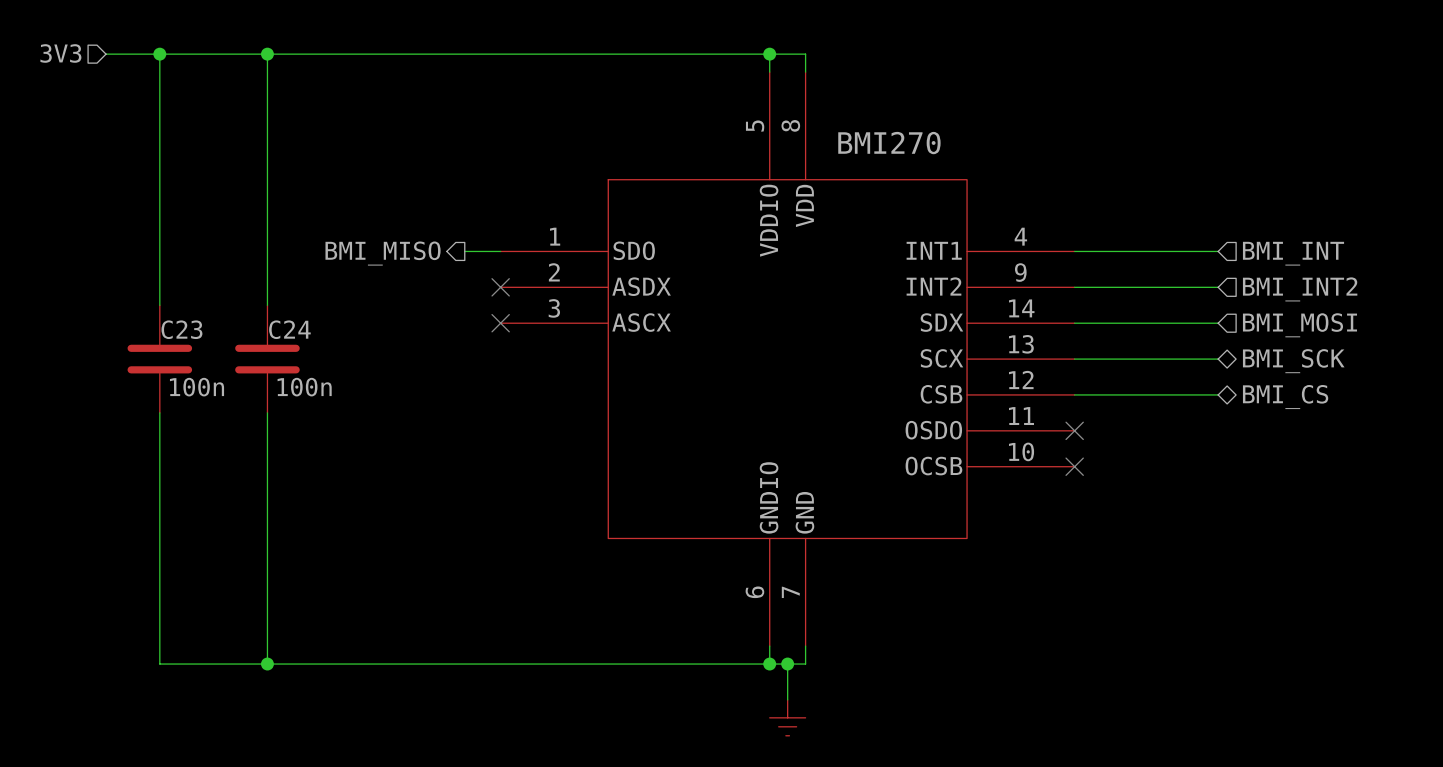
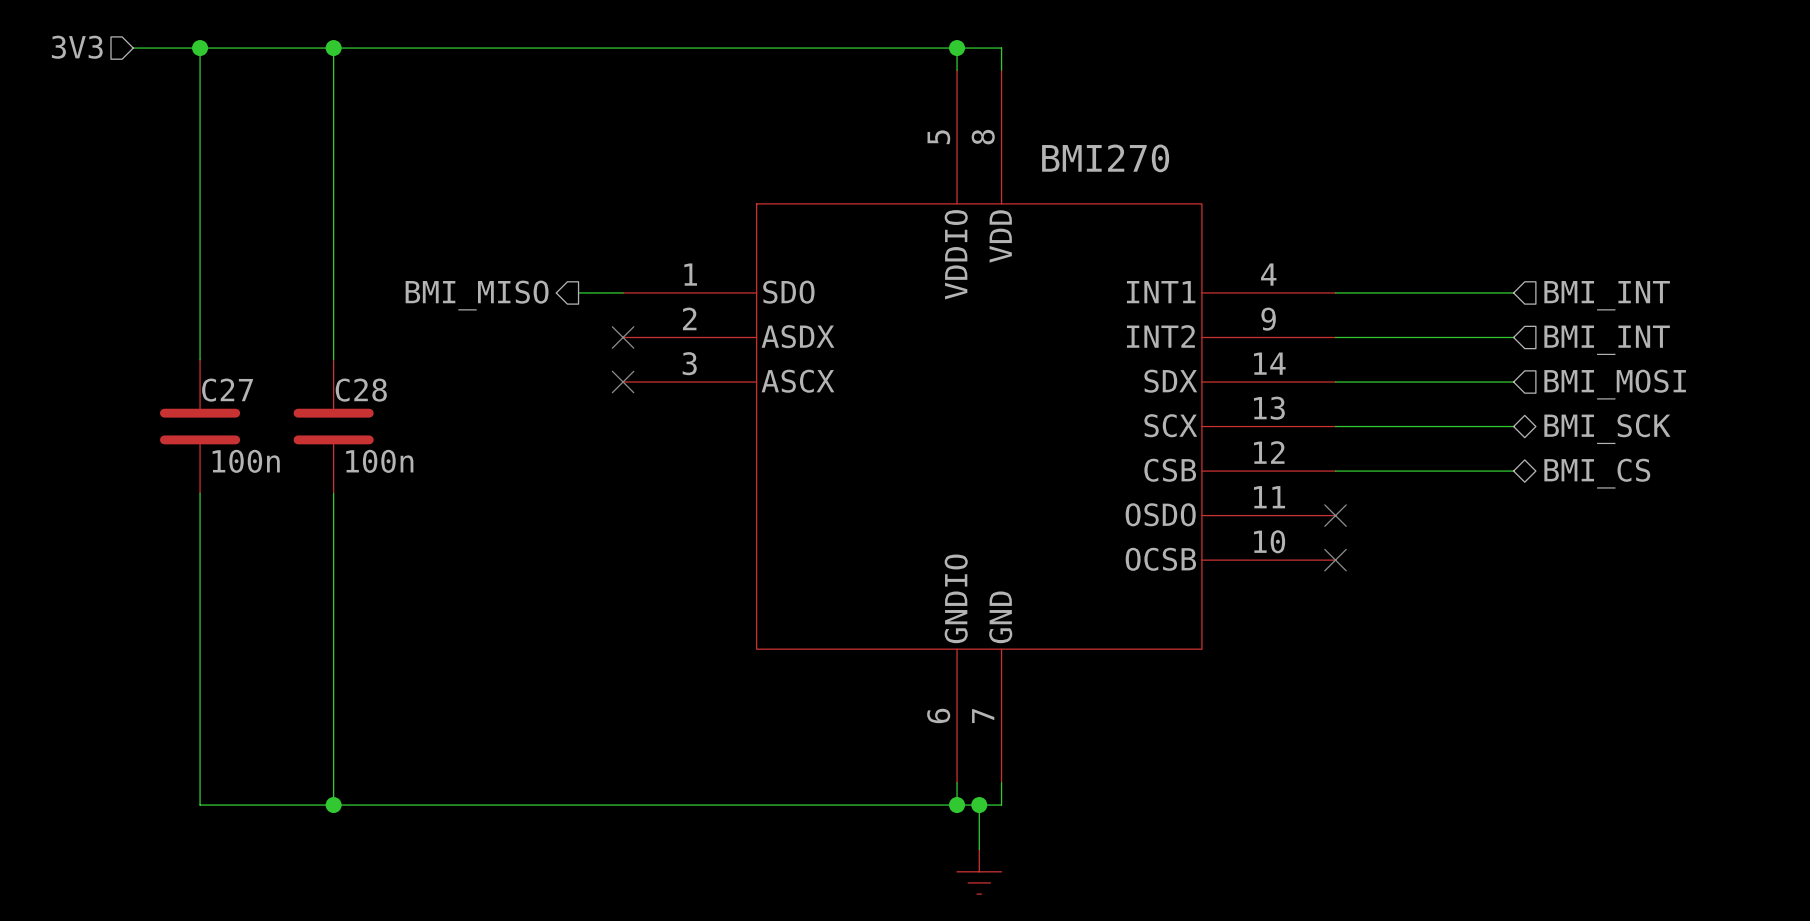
hierarchical label: BMI_INT2 (1300, 289) -> BMI_INT (1607, 340)
C23 name: C23 (181, 329) -> C27 (227, 390)
C24 name: C24 (289, 329) -> C28 (361, 390)

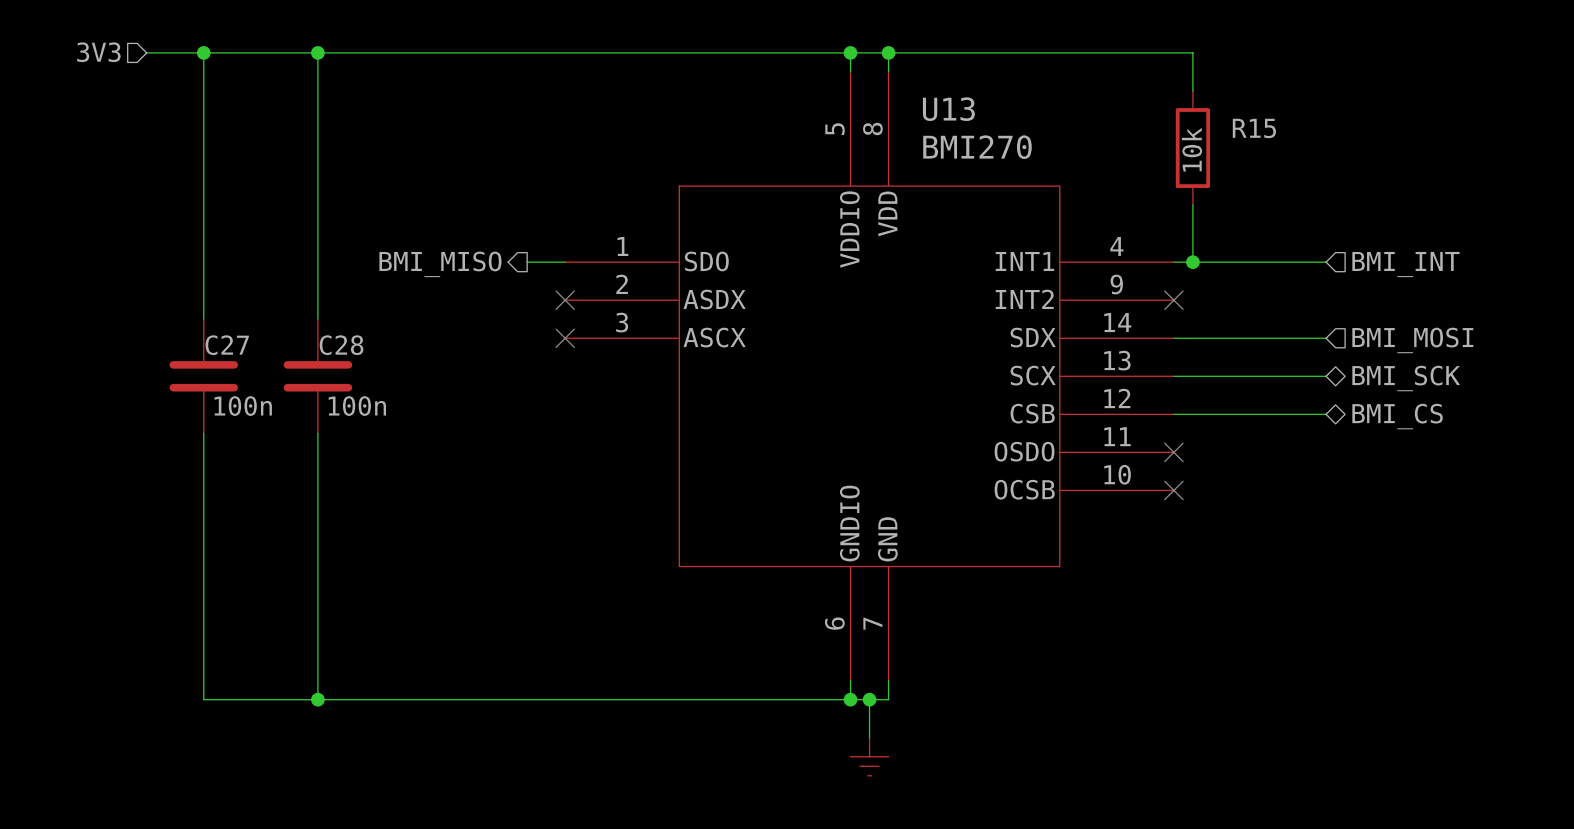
wire: none -> (888, 52) (1192, 52) (1192, 90)
junction: none -> (888, 52)
U13 name: none -> U13 (948, 109)
R15: none -> 10k (1192, 148)
wire: none -> (1192, 205) (1192, 262)
junction: none -> (1192, 262)
wire: (1335, 337) (1513, 337) -> none
no-connect mark: none -> (1173, 300)
hierarchical label: BMI_INT (1607, 340) -> none

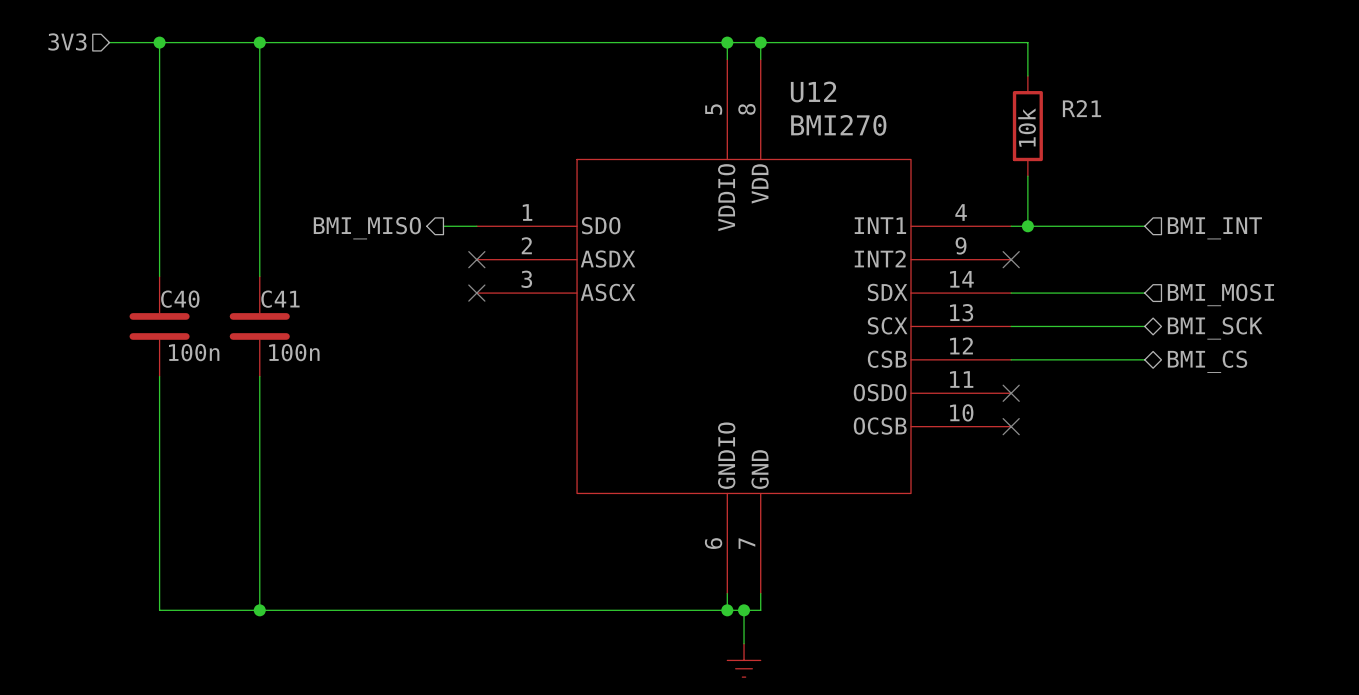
U13 name: U13 (948, 109) -> U12 (813, 91)
R15 name: R15 (1254, 128) -> R21 (1081, 108)
C27 name: C27 (227, 345) -> C40 (180, 299)
C28 name: C28 (341, 345) -> C41 (280, 299)

